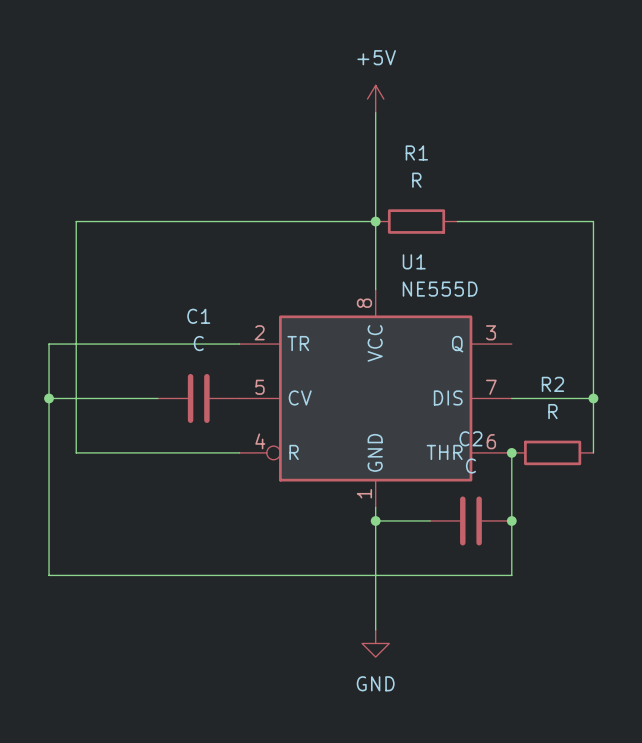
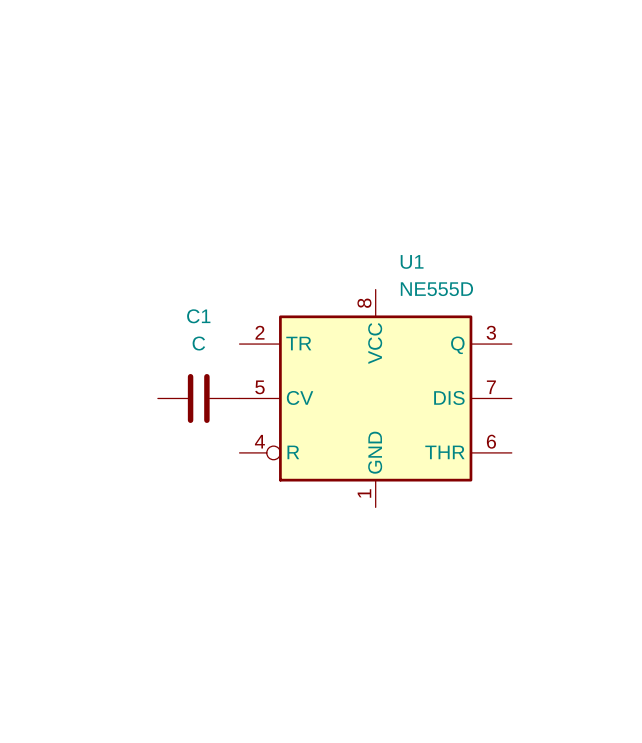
power symbol: +5V (375, 99) -> none
wire: (375, 112) (375, 289) -> none
wire: (375, 221) (76, 221) (76, 452) (239, 452) -> none
junction: (375, 221) -> none
R1: R (416, 221) -> none
wire: (457, 221) (593, 221) (593, 452) -> none
wire: (239, 344) (49, 344) (49, 575) (511, 575) (511, 452) -> none
wire: (49, 398) (157, 398) -> none
junction: (49, 398) -> none
wire: (511, 398) (593, 398) -> none
junction: (593, 398) -> none
junction: (511, 452) -> none
R2: R (552, 452) -> none
wire: (375, 507) (375, 629) -> none
wire: (375, 520) (430, 520) -> none
junction: (375, 520) -> none
C2: C (470, 520) -> none
junction: (511, 520) -> none
power symbol: GND (375, 643) -> none

